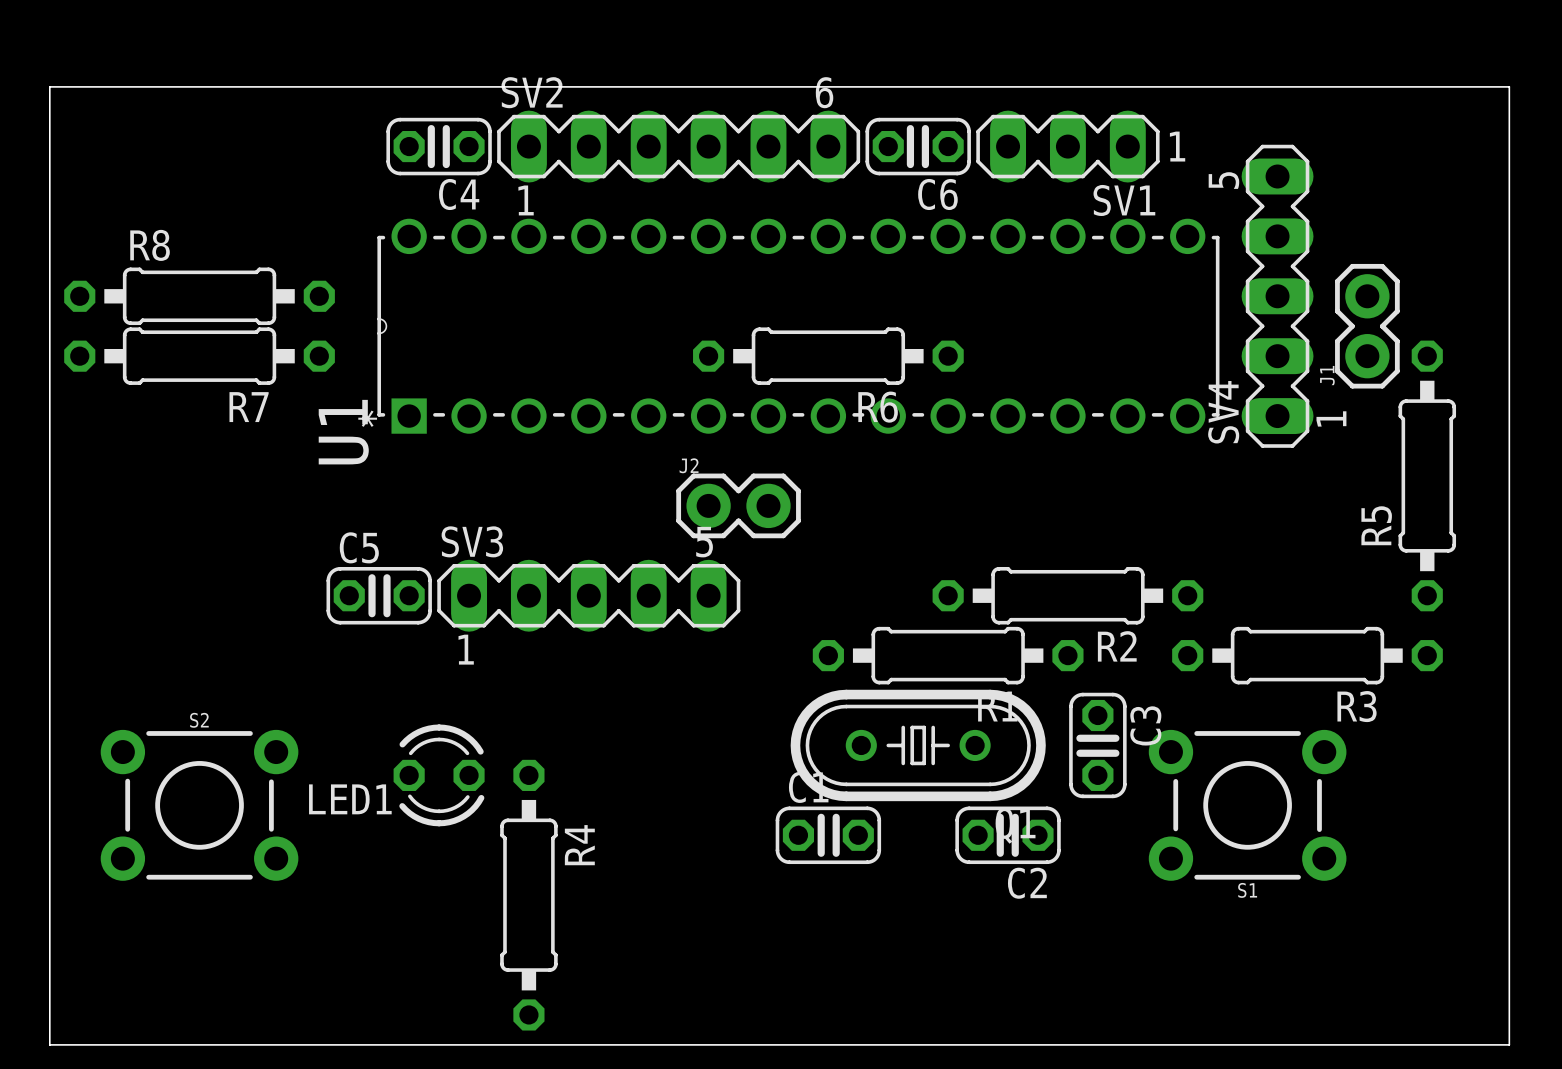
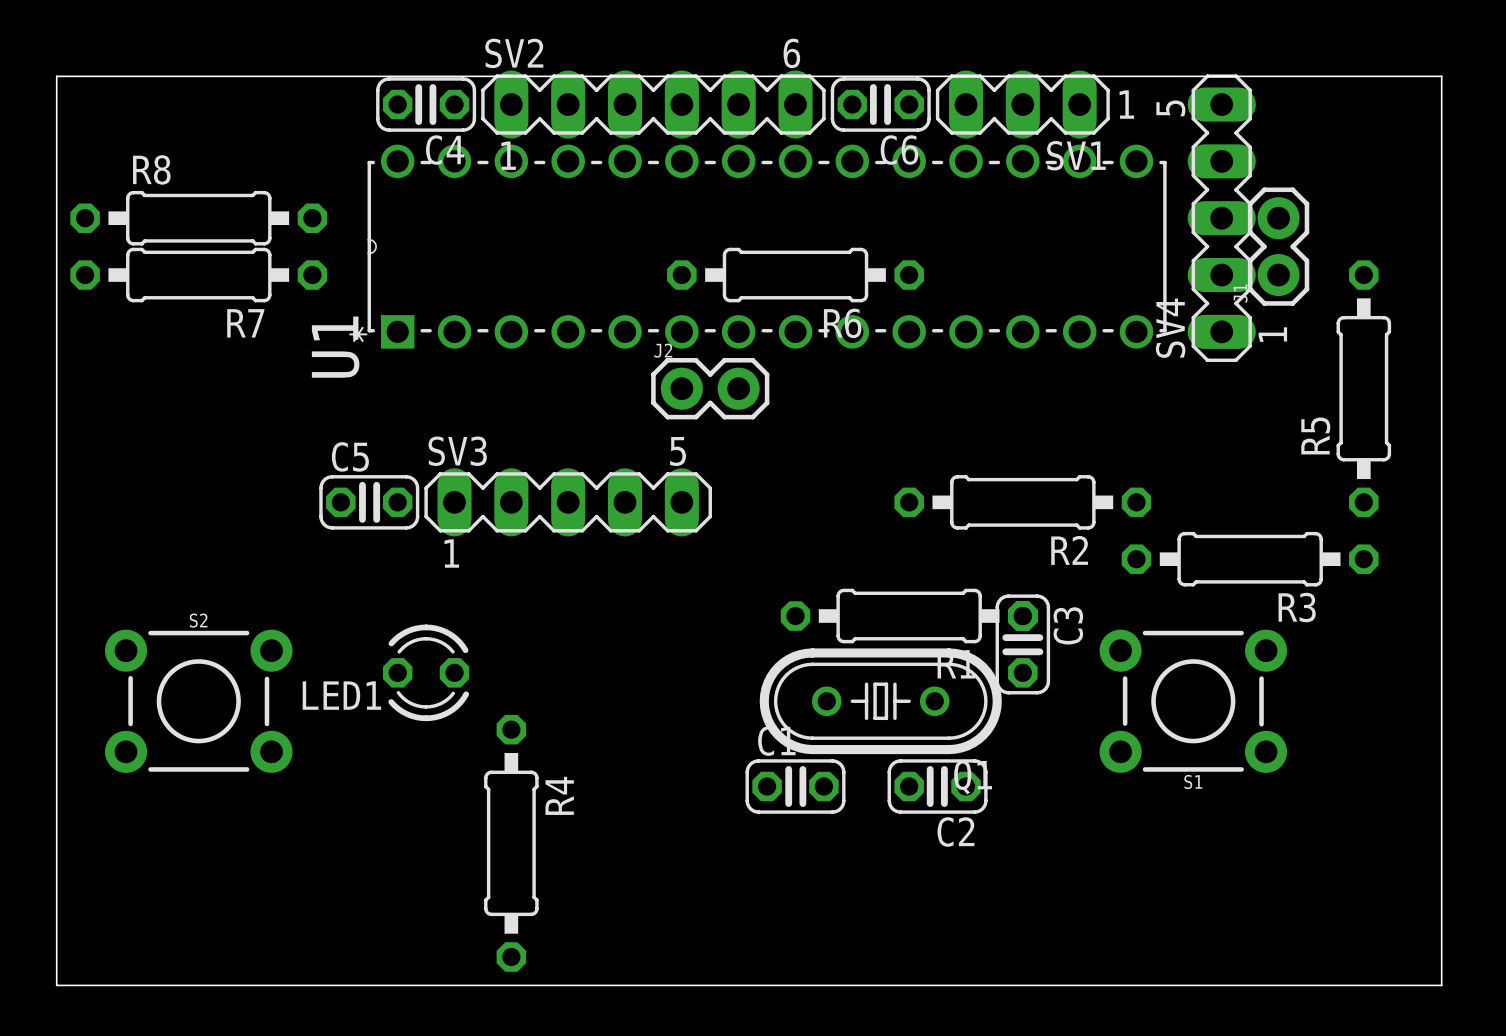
C4 position: (439, 146) -> (426, 104)
SV2 position: (678, 146) -> (653, 104)
C6 position: (918, 146) -> (880, 104)
SV1 position: (1067, 146) -> (1022, 104)
R8: none -> (198, 218)
R8 name: R8 (150, 245) -> R7 (245, 323)
SV4 position: (1277, 296) -> (1221, 218)
U1 position: (798, 326) -> (767, 246)
J1 position: (1367, 326) -> (1278, 246)
R7: (199, 356) -> none
R6 position: (828, 356) -> (795, 275)
R5 position: (1427, 475) -> (1363, 388)
J2 position: (738, 505) -> (710, 388)
C5 position: (379, 595) -> (369, 502)
SV3 position: (588, 595) -> (568, 502)
R2 position: (1067, 595) -> (1022, 502)
R3 position: (1307, 655) -> (1250, 559)
C3 position: (1097, 745) -> (1022, 644)
LED1 position: (439, 775) -> (426, 672)
S2 position: (199, 805) -> (198, 701)
S1 position: (1247, 805) -> (1193, 701)
C2 position: (1008, 835) -> (937, 786)

